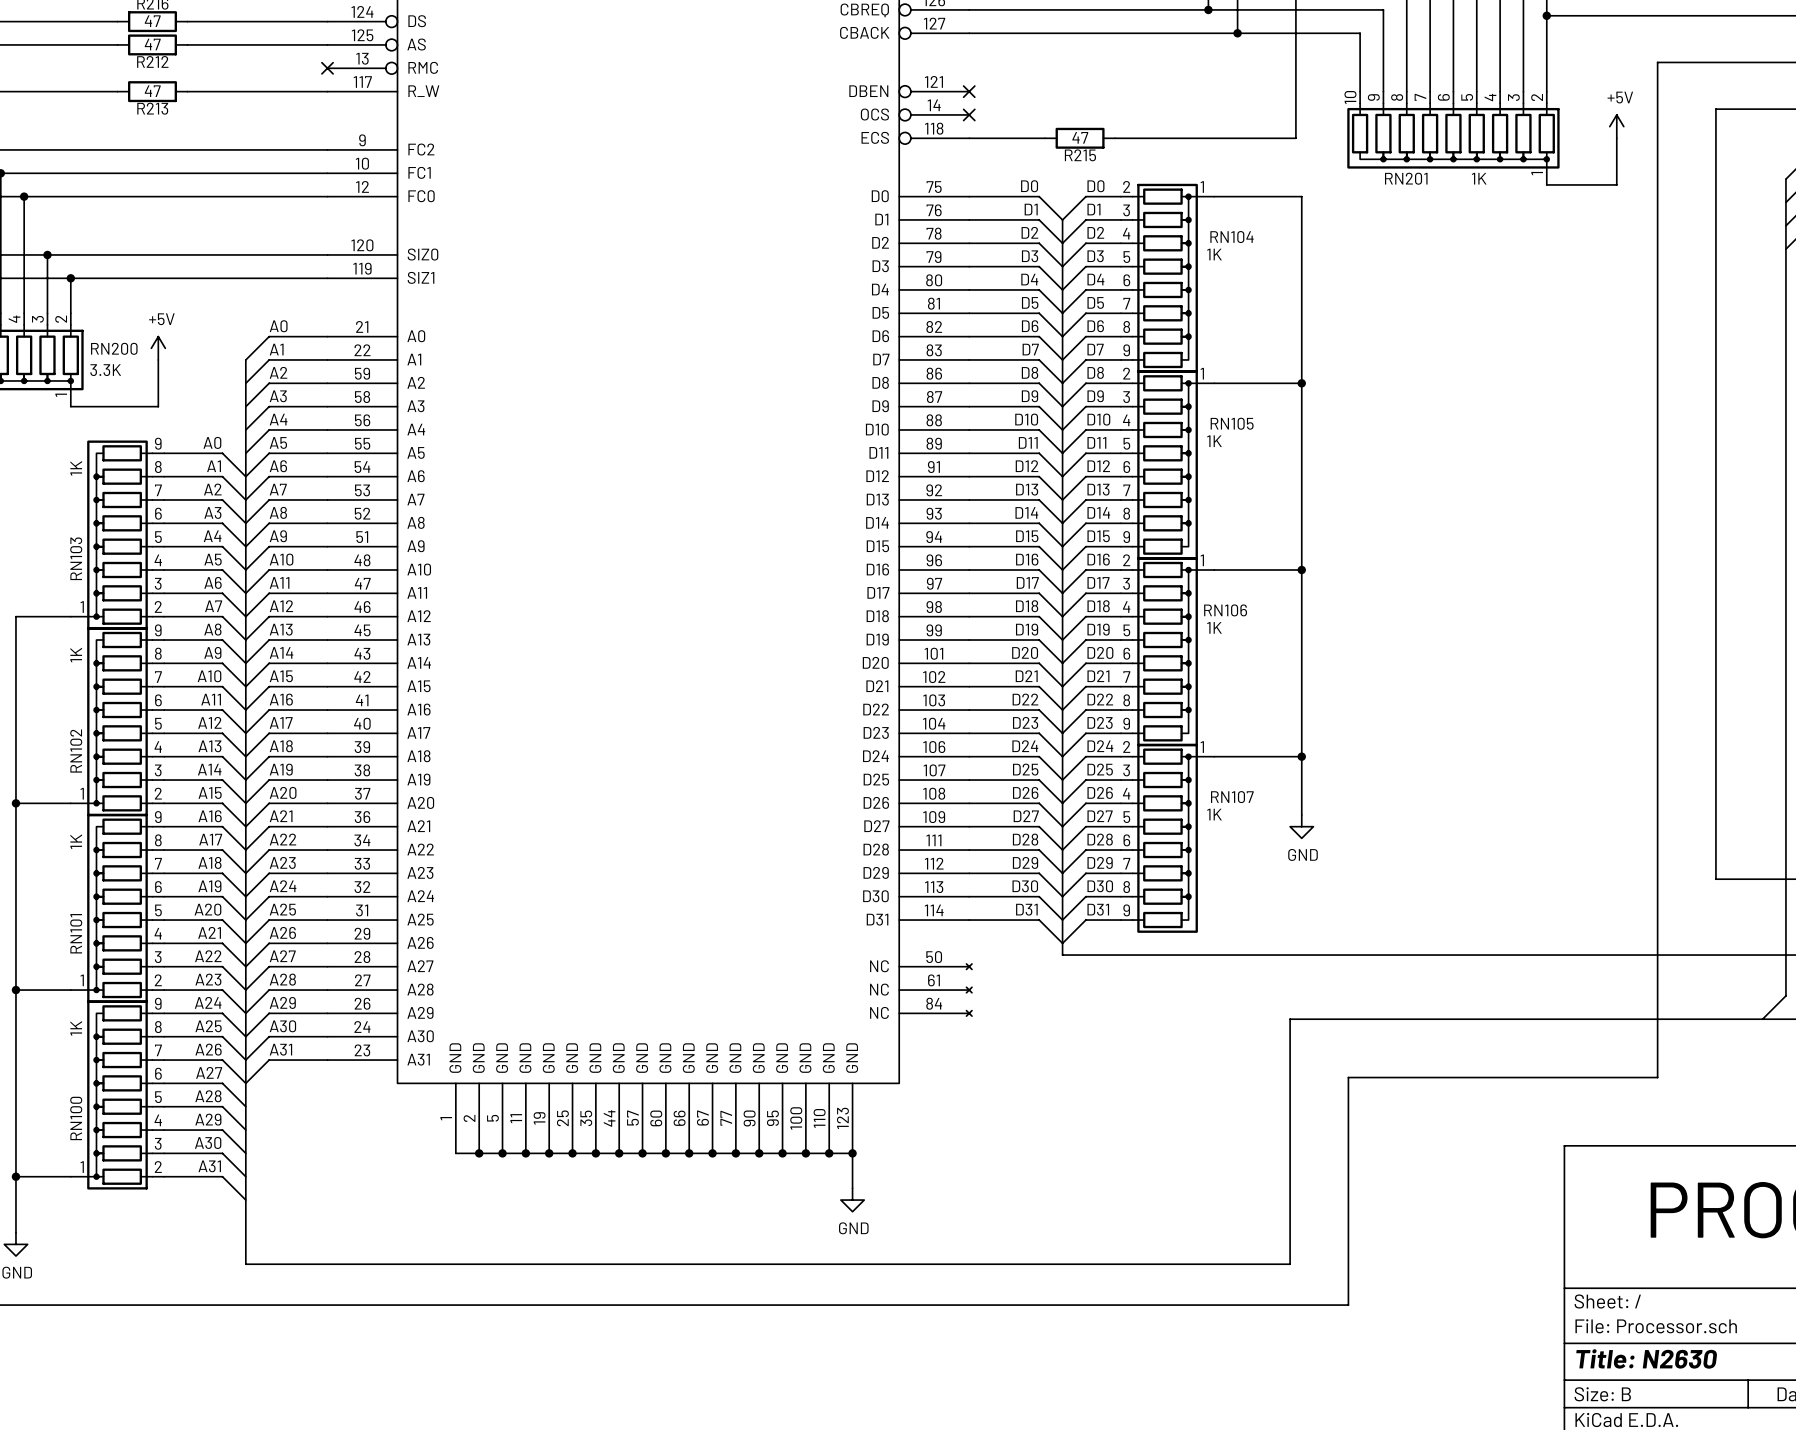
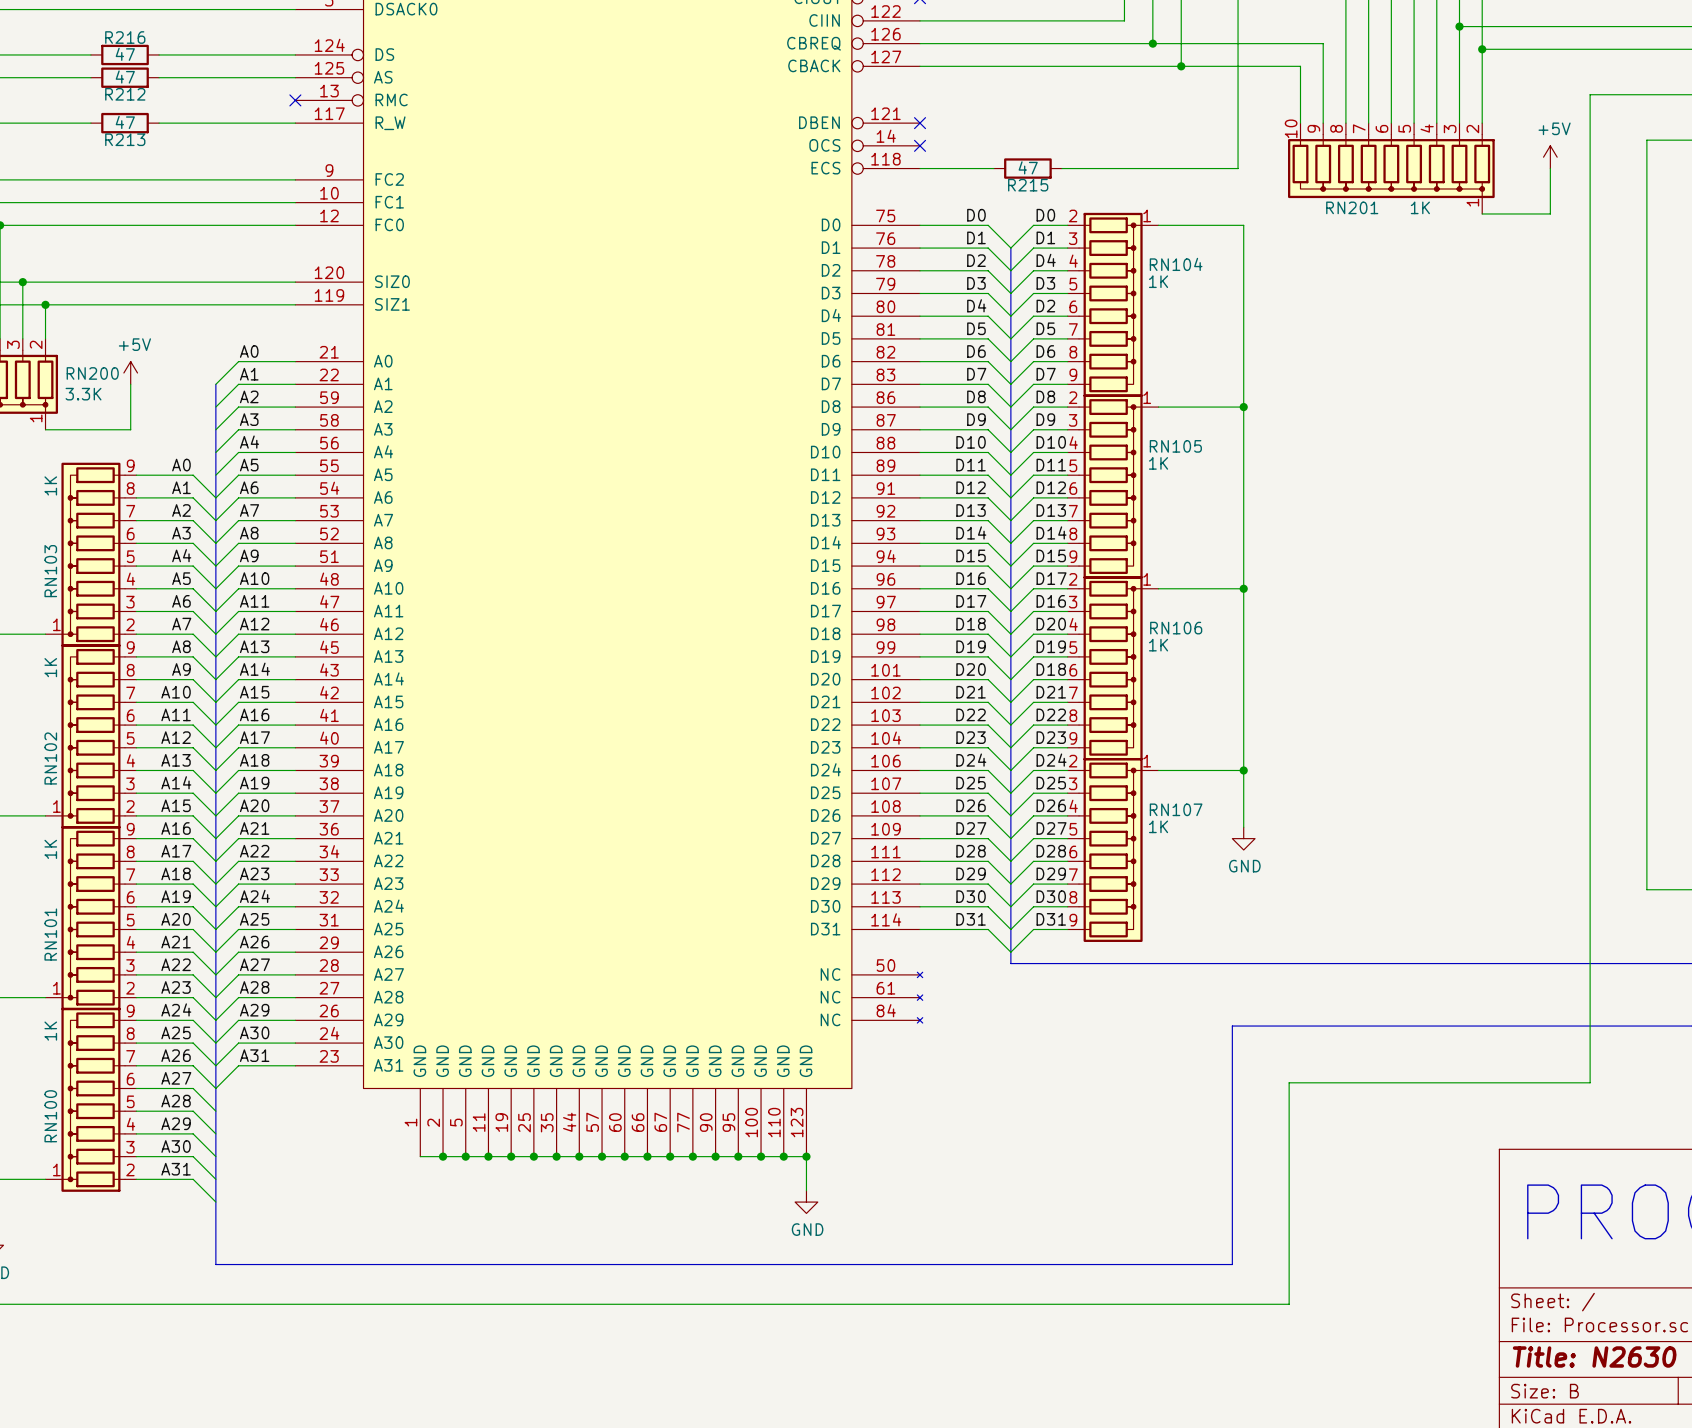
label: D2 (1095, 232) -> D4 (1046, 260)
label: D4 (1095, 279) -> D2 (1045, 306)
label: D16 (1098, 559) -> D17 (1051, 578)
label: D17 (1098, 582) -> D16 (1051, 601)
label: D18 (1098, 606) -> D20 (1051, 624)
label: D20 (1100, 652) -> D18 (1051, 669)

